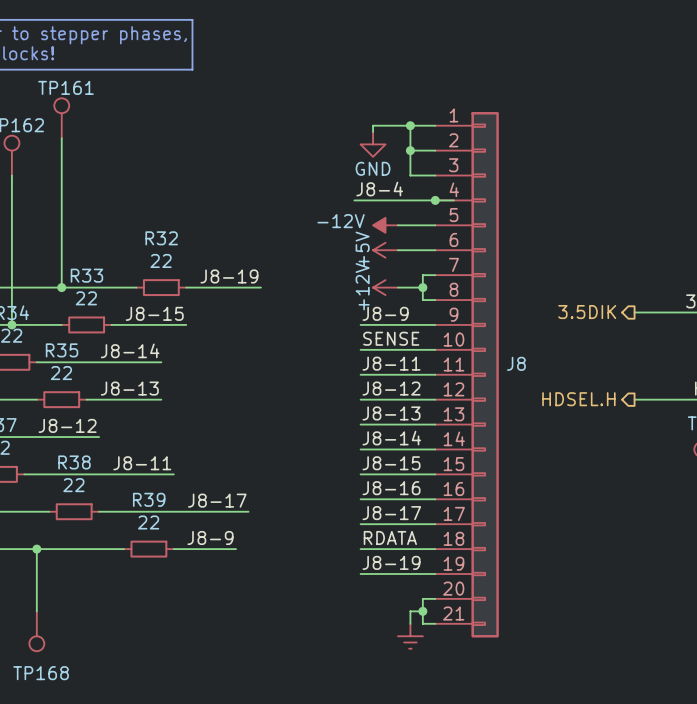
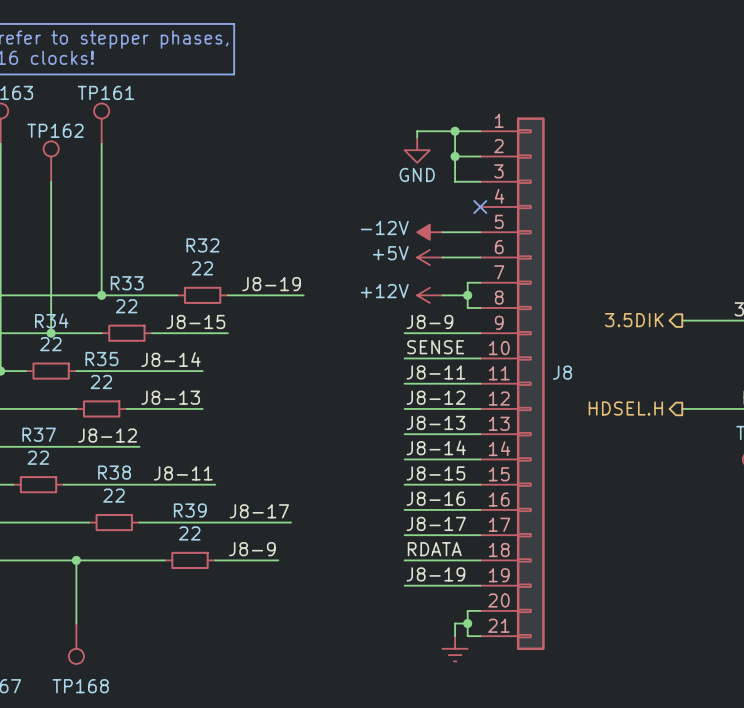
label: J8-4 (379, 189) -> none
wire: (354, 200) (453, 200) -> none
junction: (435, 200) -> none
no-connect mark: none -> (480, 207)
power symbol text rotation: 0° (362, 249) -> 90° clockwise (390, 253)
power symbol text rotation: 0° (362, 286) -> 90° clockwise (384, 291)

